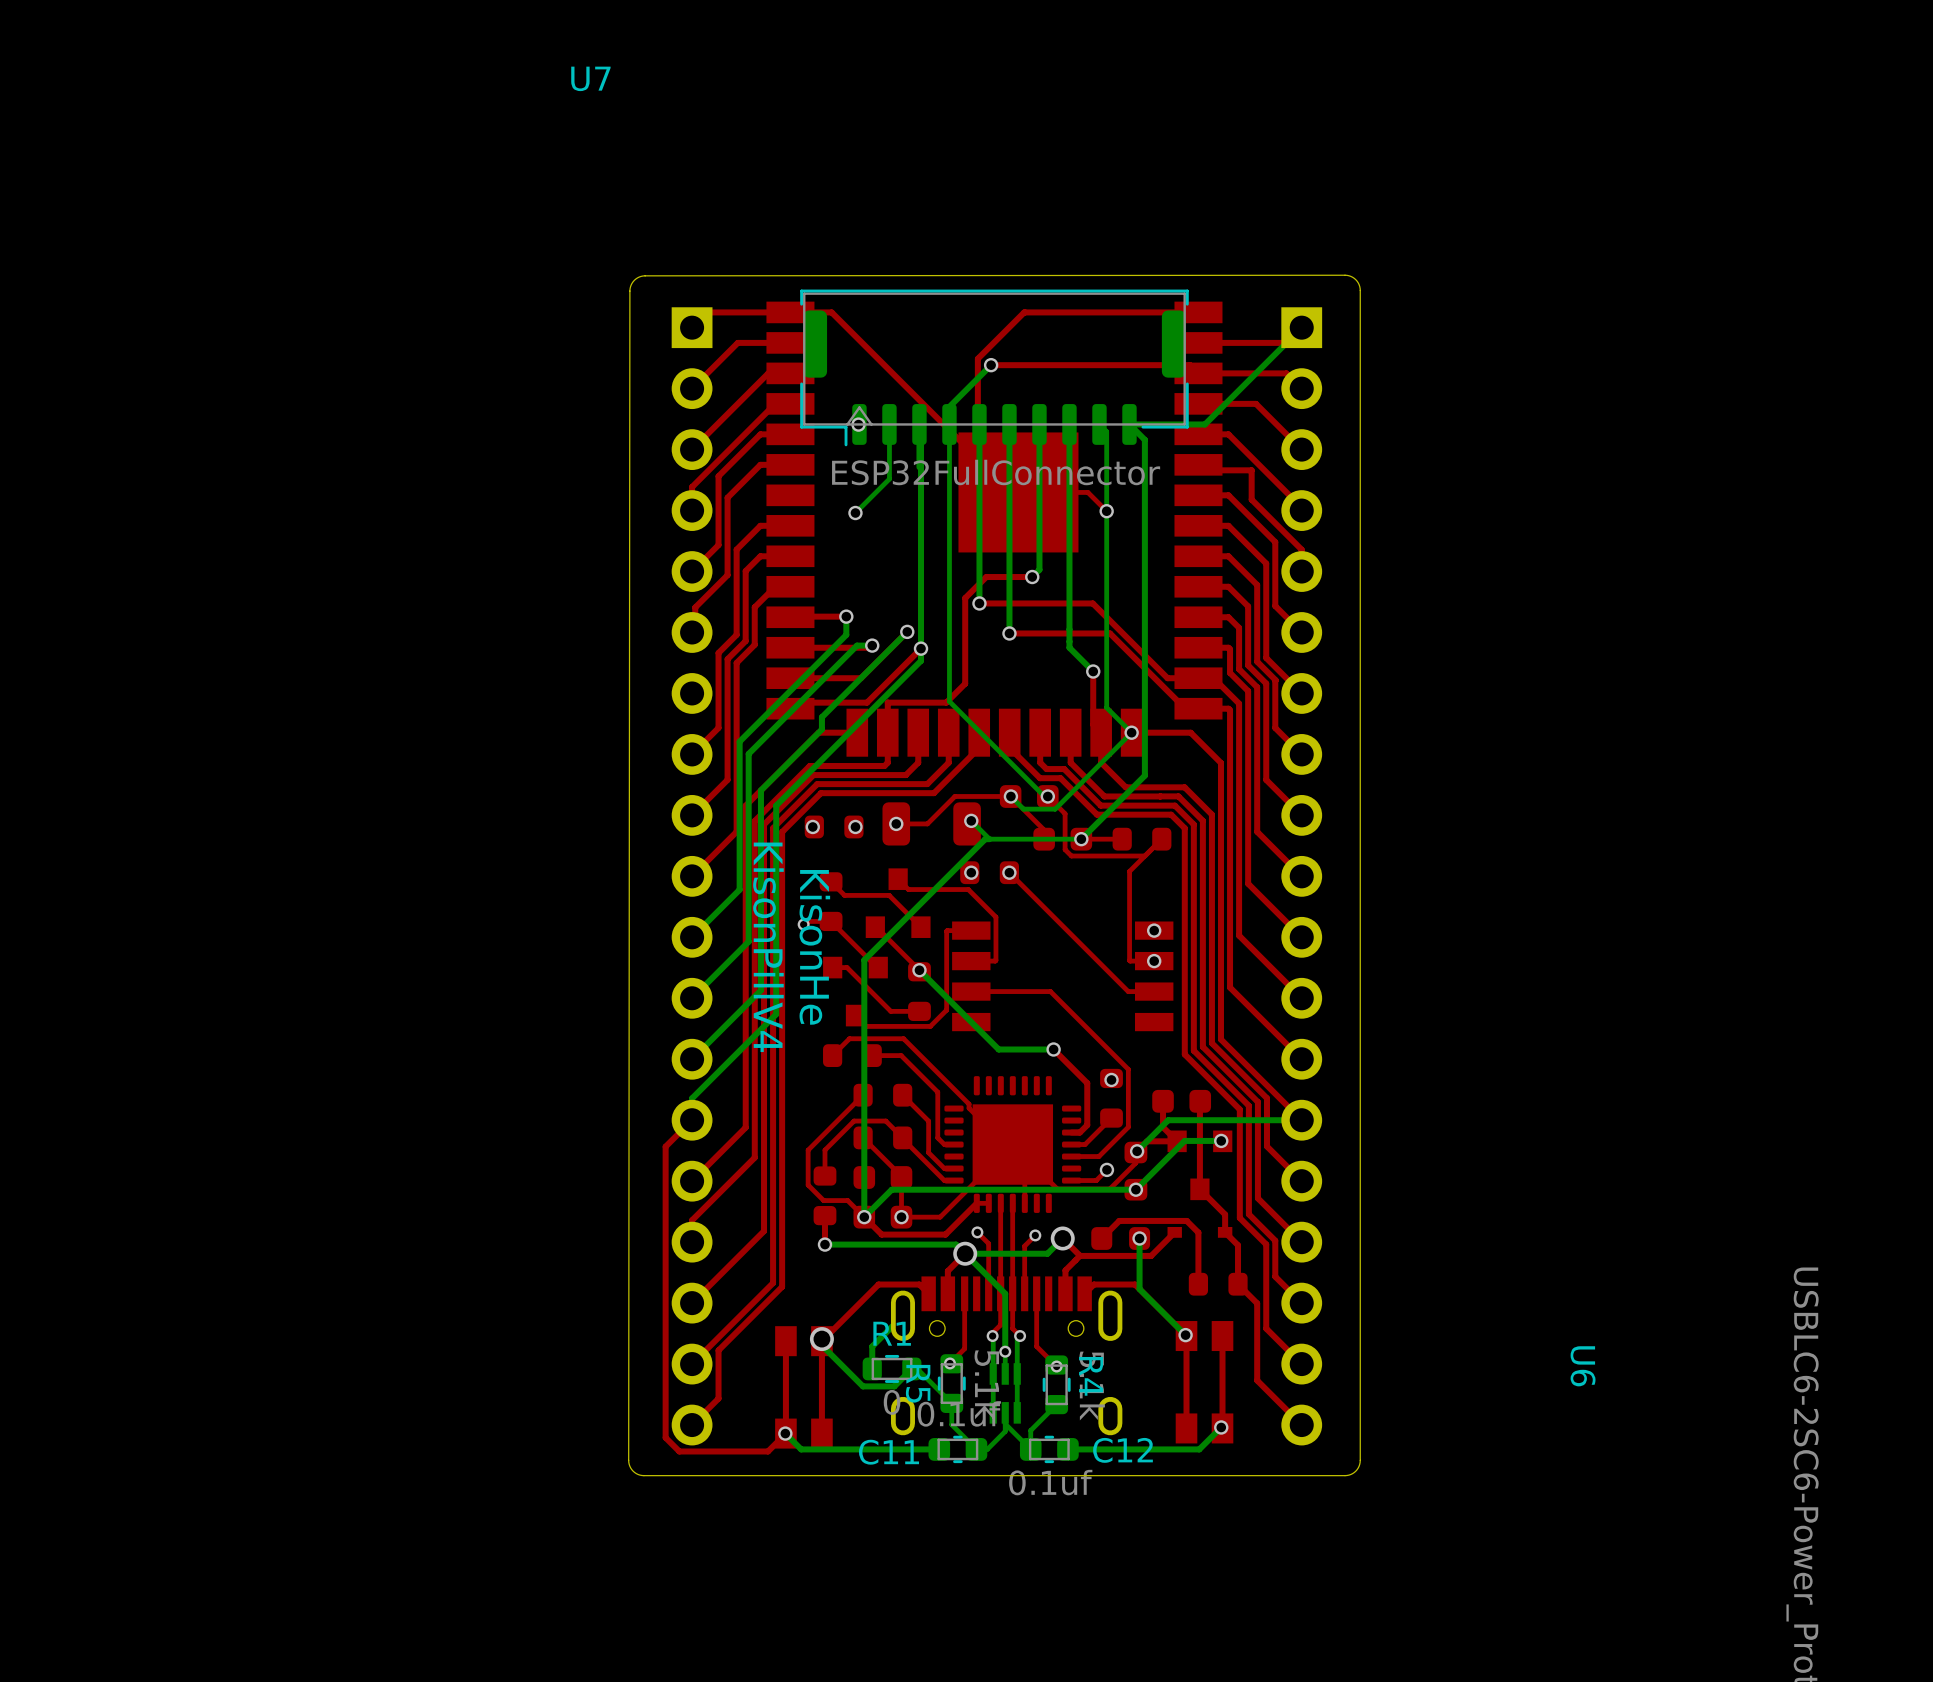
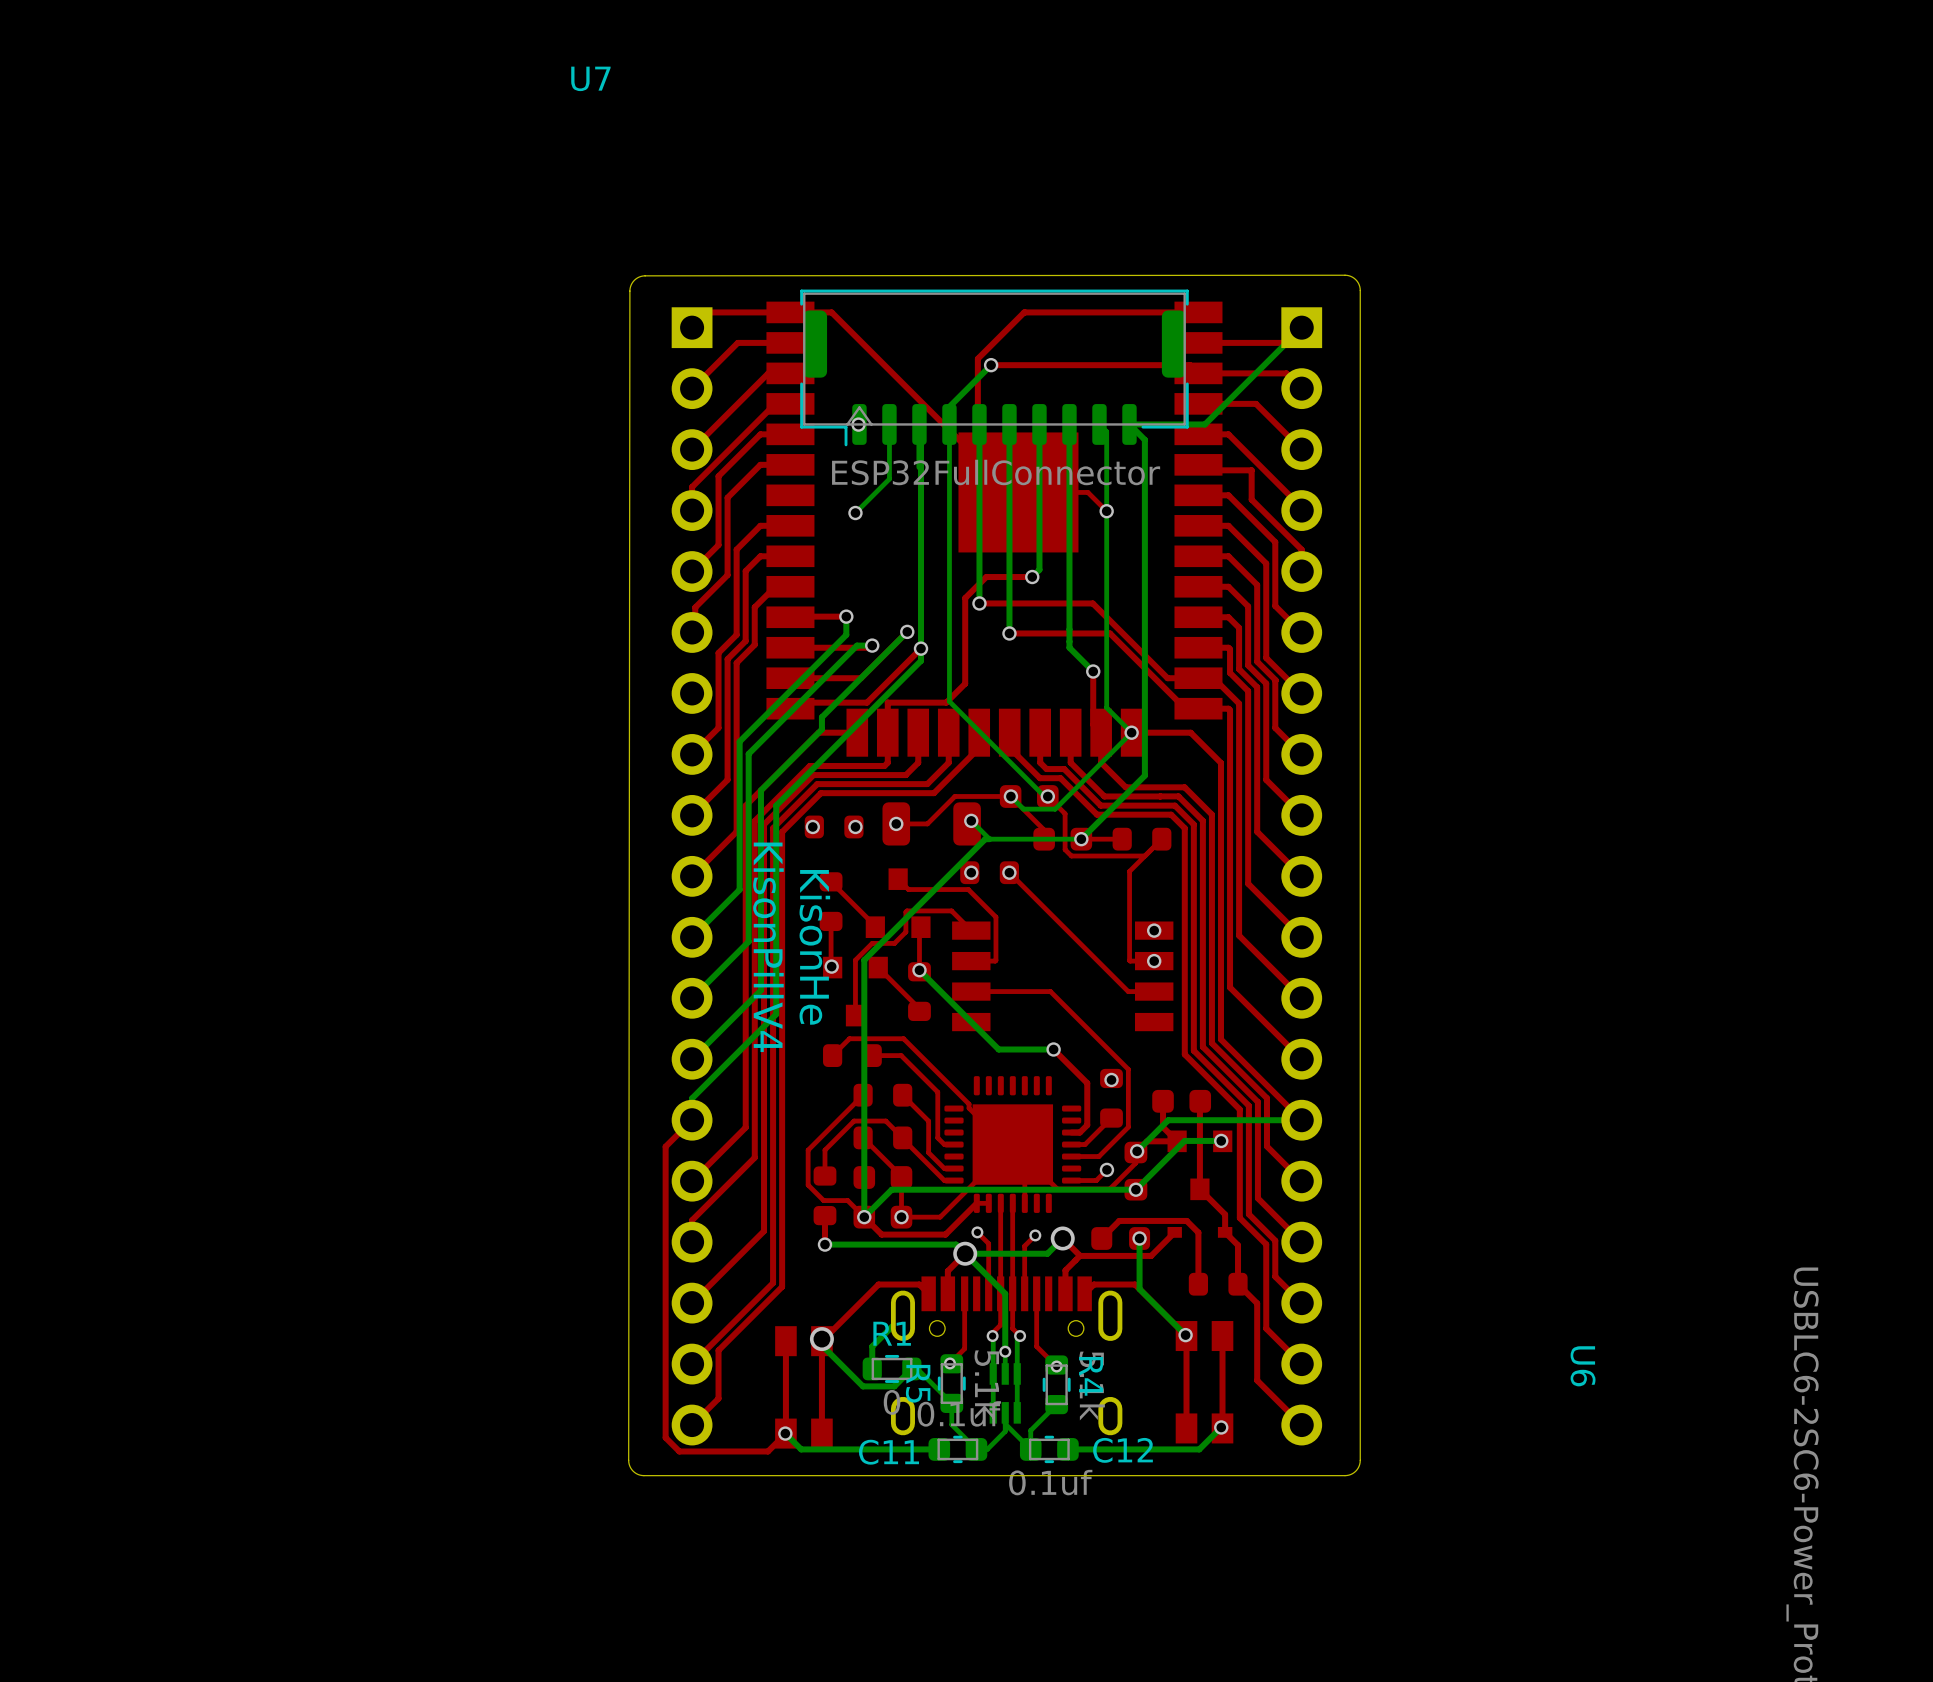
top track: (844, 895) (889, 895) (920, 927) -> (844, 895) (875, 927)
top track: none -> (831, 921) (831, 965) (832, 967)
top track: (803, 924) (806, 921) (831, 921) (878, 967) -> none
via: (803, 924) -> none
top track: (875, 927) (919, 970) -> (920, 927) (919, 970)
top track: (971, 930) (946, 931) (946, 1010) (930, 1026) (866, 1026) (855, 1015) -> (971, 930) (951, 910) (906, 910) (905, 932) (894, 943) (872, 943) (855, 960) (855, 1015)
via: none -> (831, 966)
top track: (832, 967) (847, 967) (890, 1011) (919, 1011) -> (878, 967) (919, 1008) (919, 1011)

